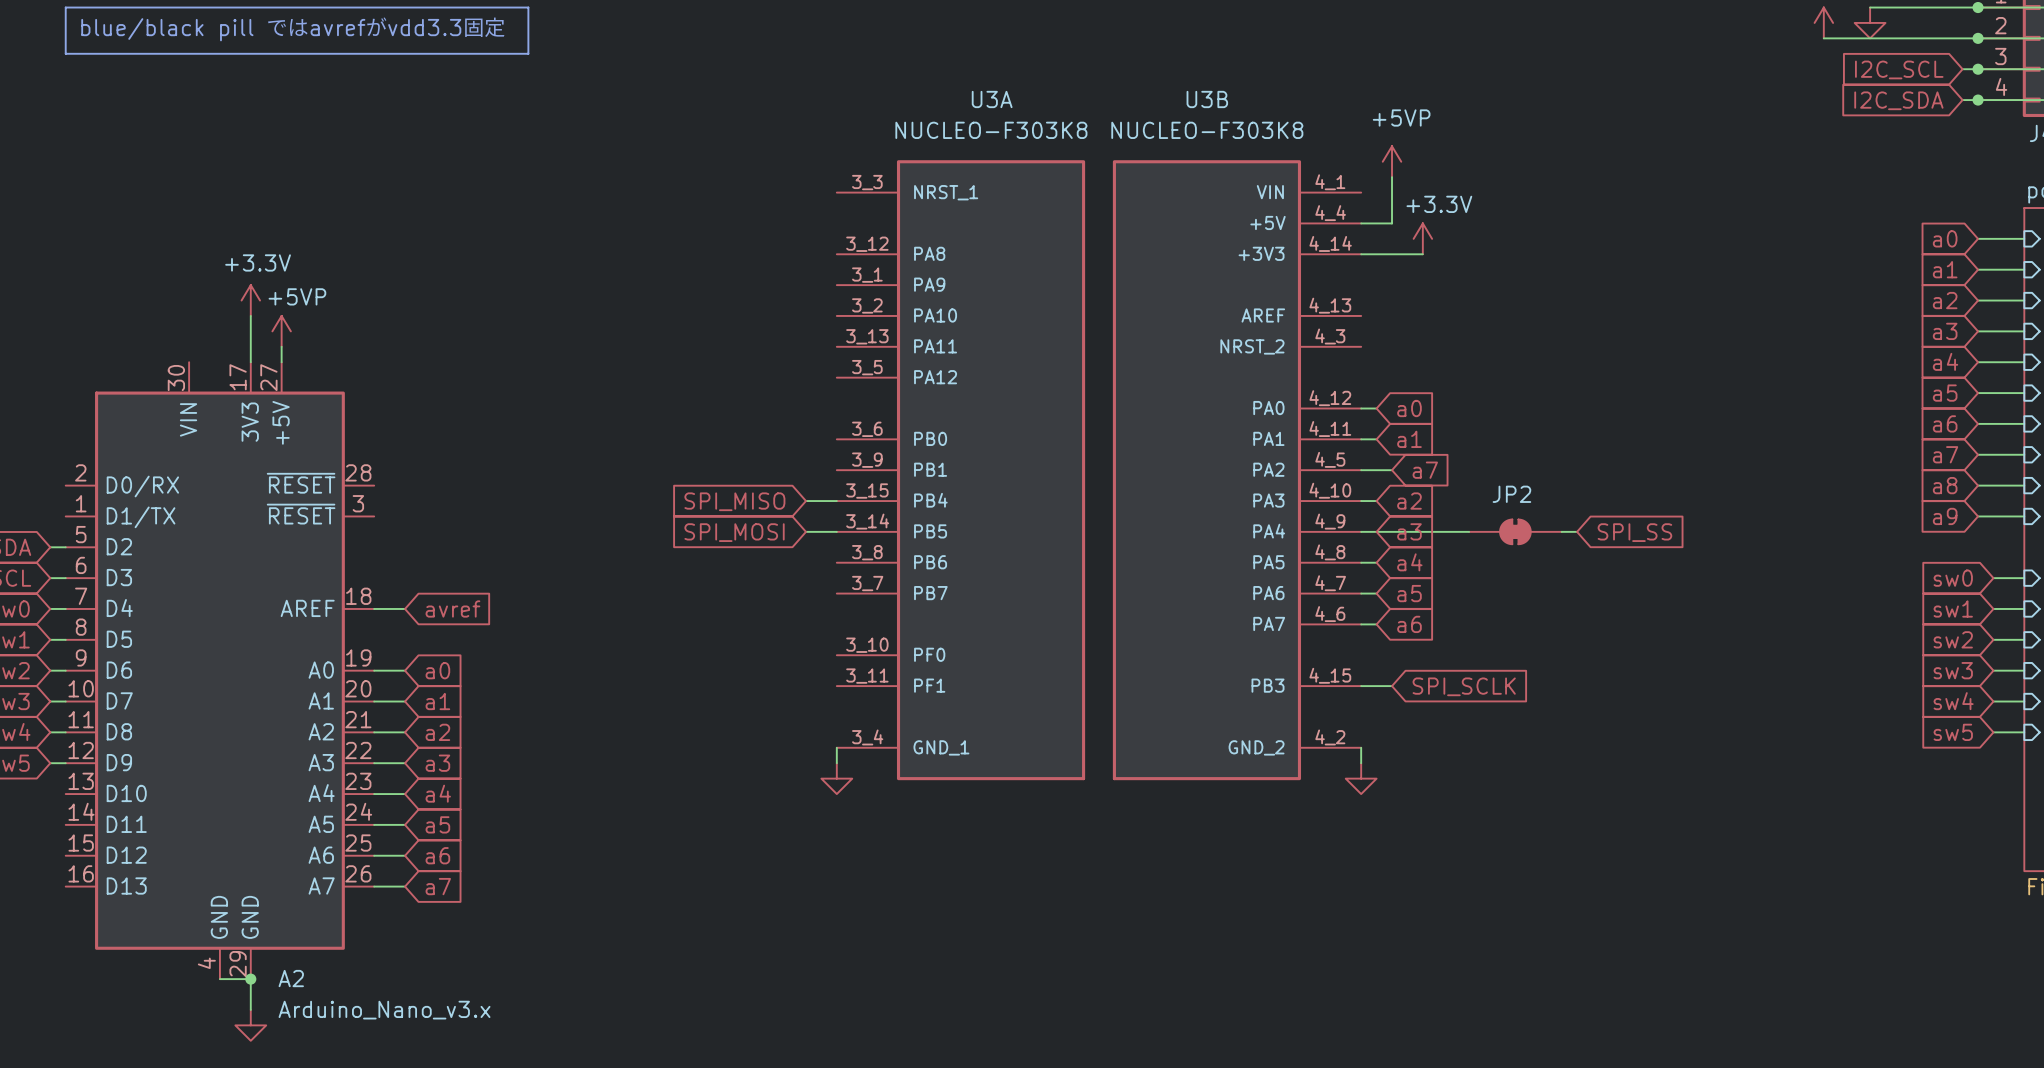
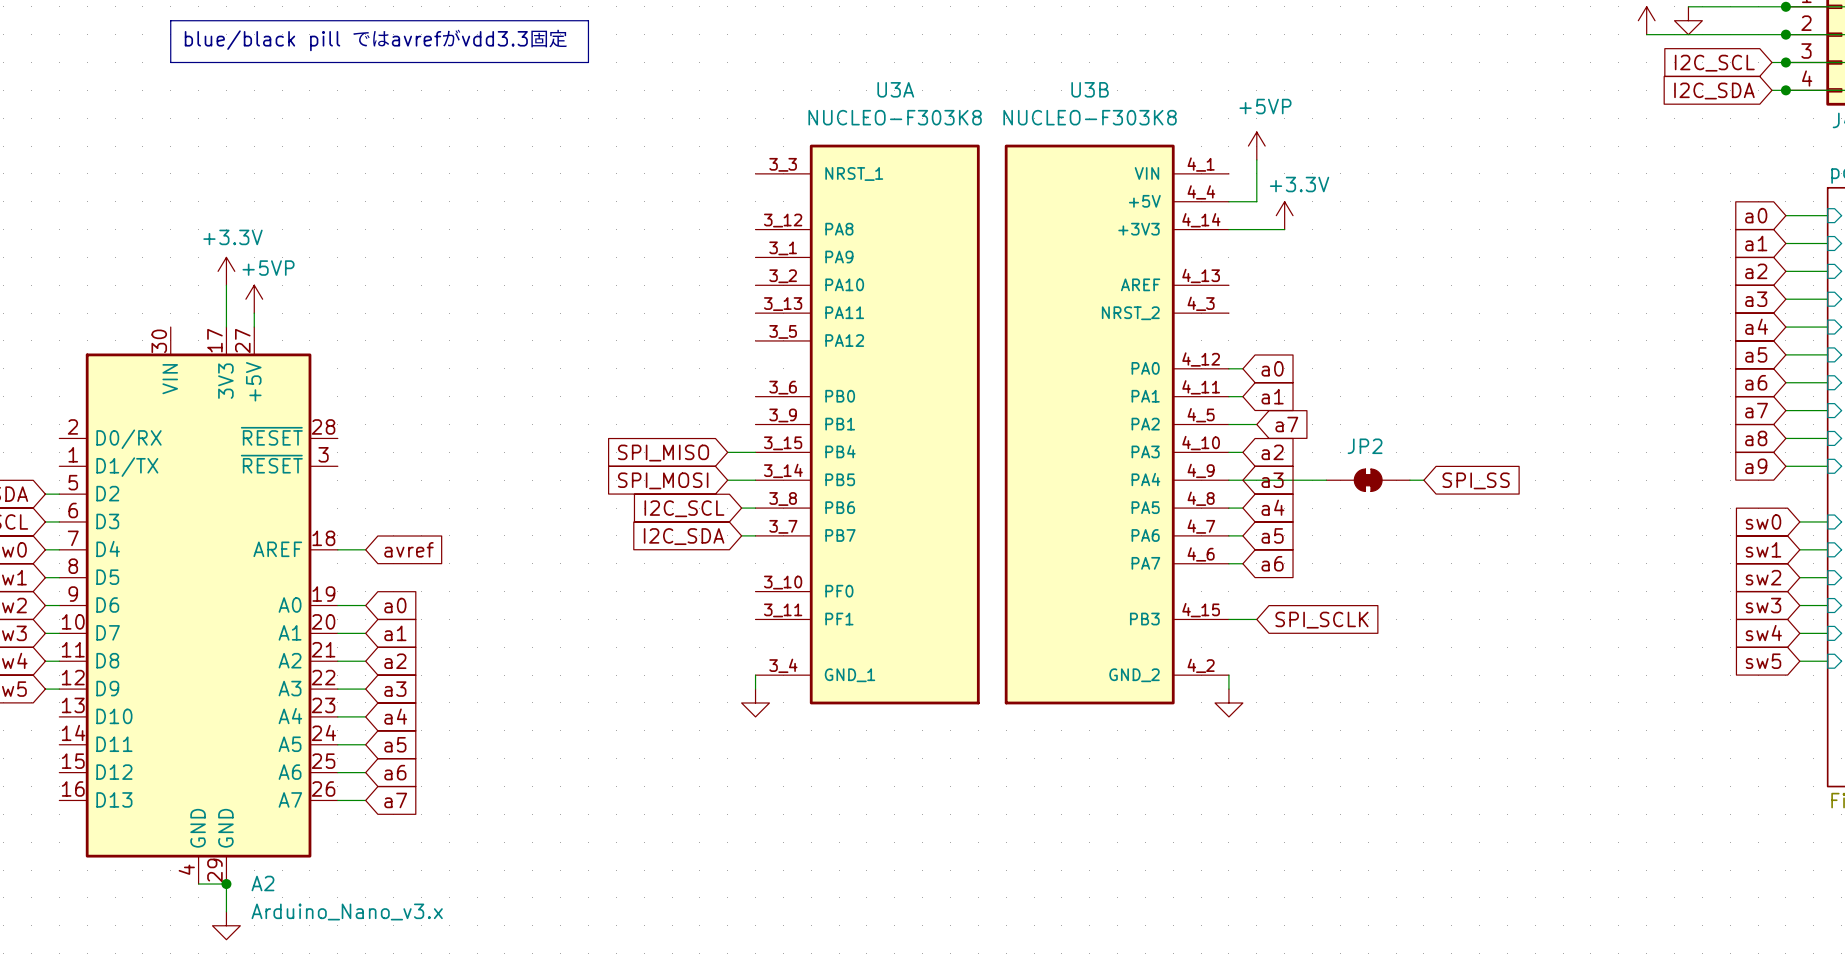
line: (65, 7) (528, 7) (528, 53) (65, 53) (65, 7) -> (170, 20) (588, 20) (588, 62) (170, 62) (170, 20)
text position: blue/black pill ではavrefがvdd3.3固定 (293, 28) -> blue/black pill ではavrefがvdd3.3固定 (376, 40)
wire: none -> (741, 508) (755, 508)
global label: none -> I2C_SCL (684, 508)
wire: none -> (741, 535) (755, 535)
global label: none -> I2C_SDA (684, 536)

